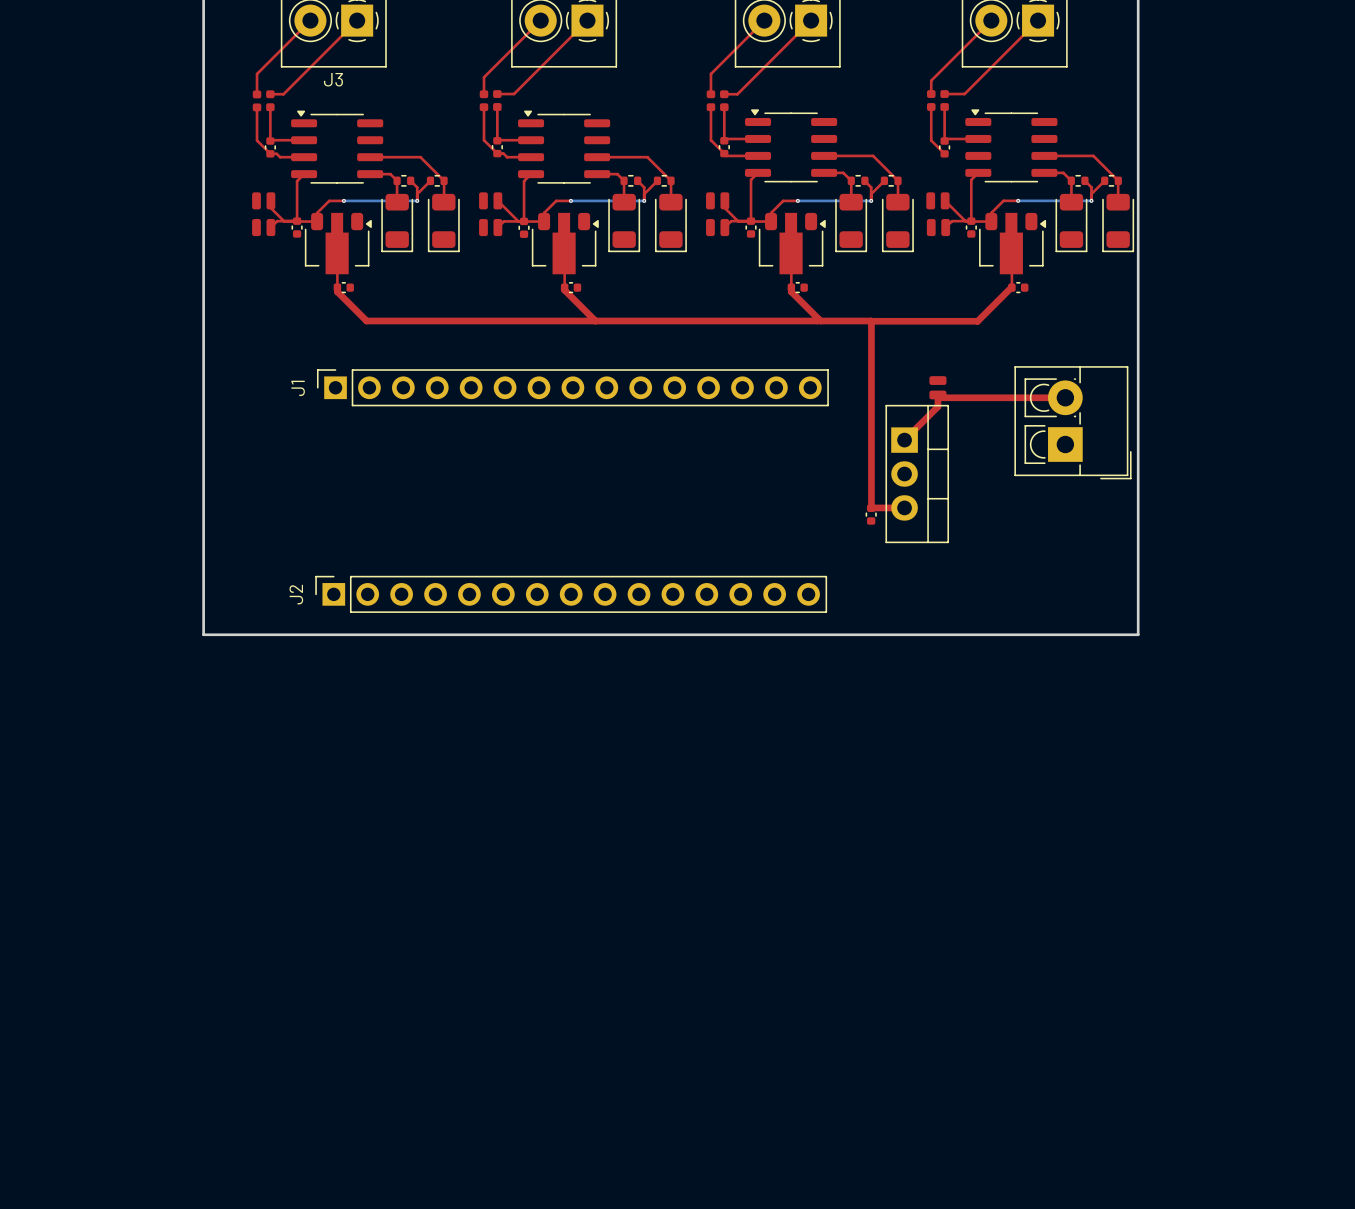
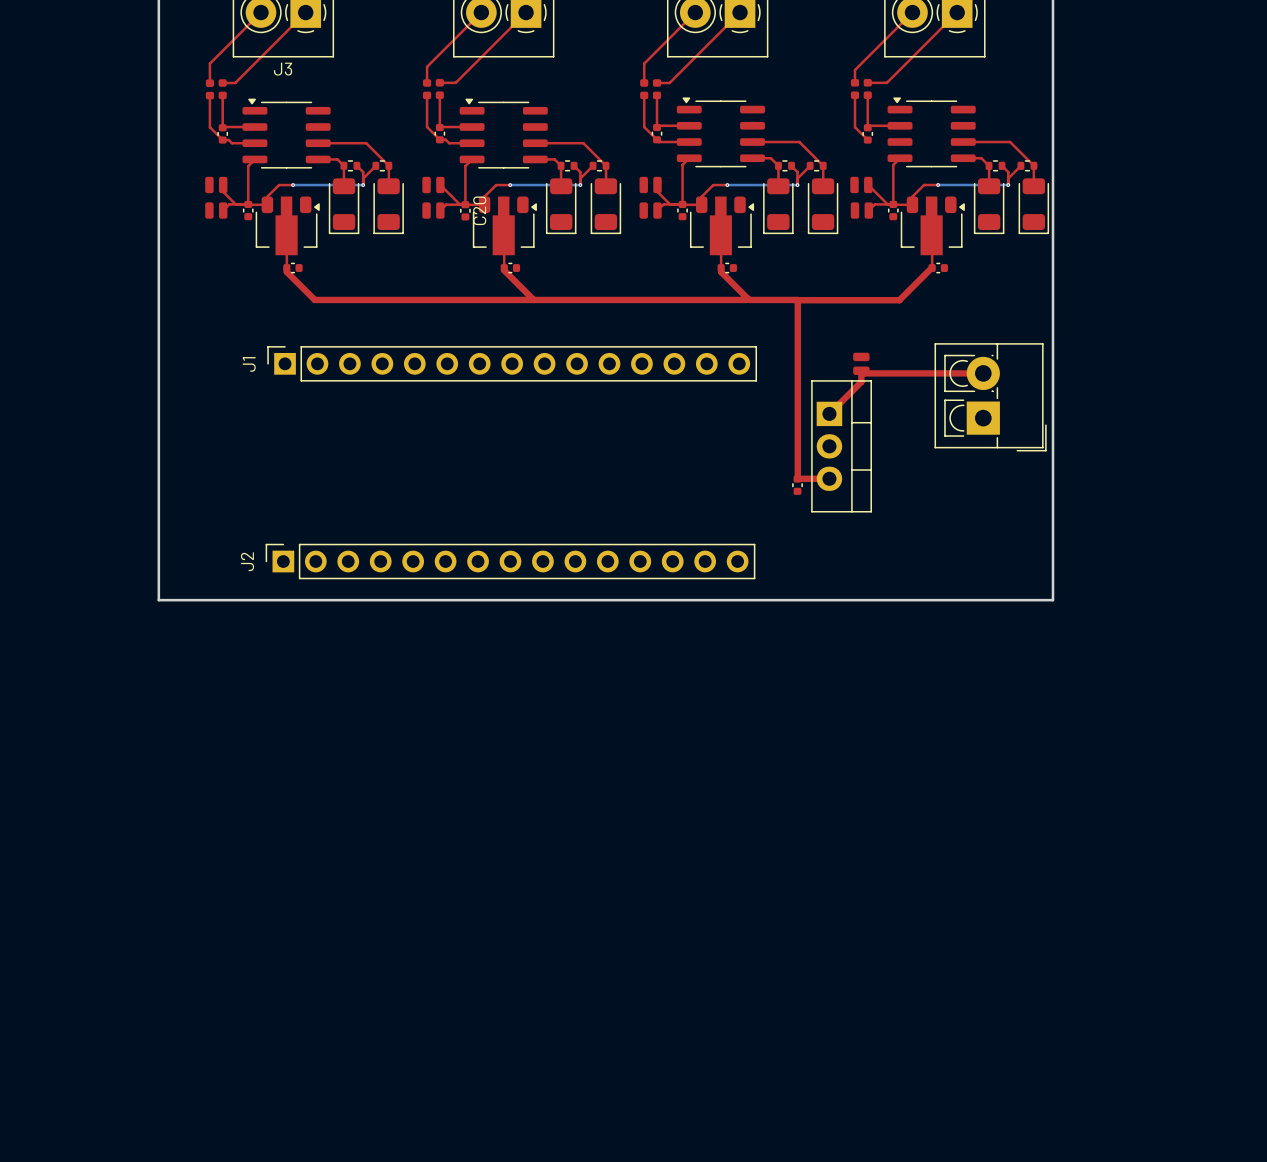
C20 name: none -> C20 (479, 210)

